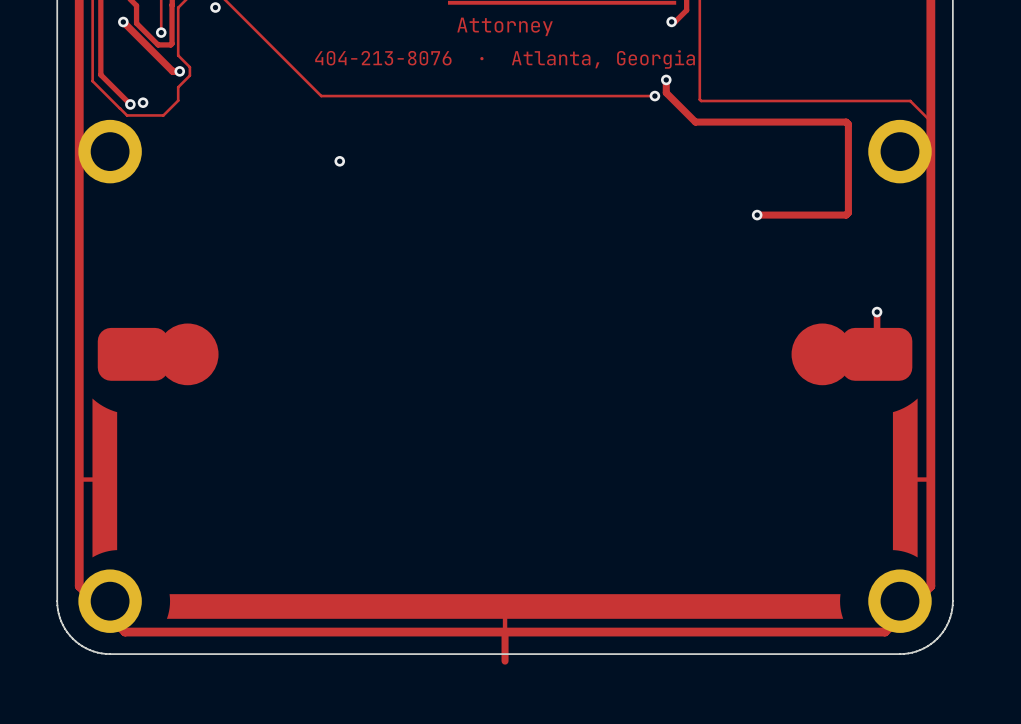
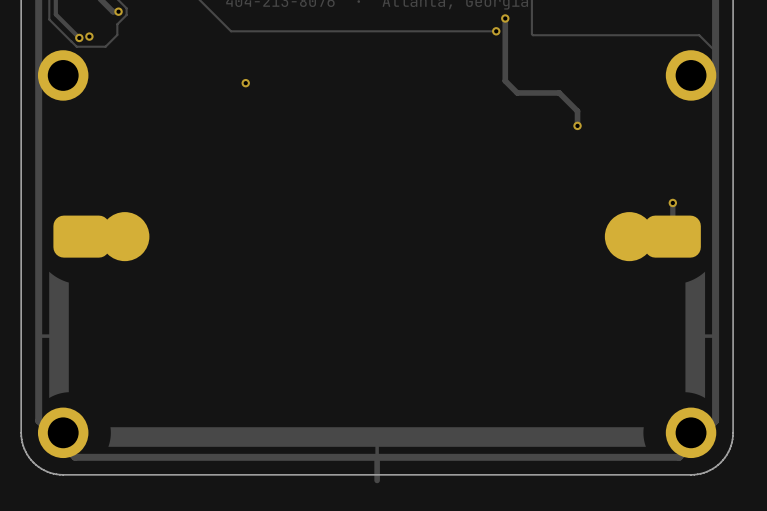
track: (666, 92) (695, 122) (846, 122) (848, 124) (848, 212) (846, 215) (757, 215) -> (505, 28) (505, 80) (517, 92) (559, 92) (577, 111) (577, 125)

